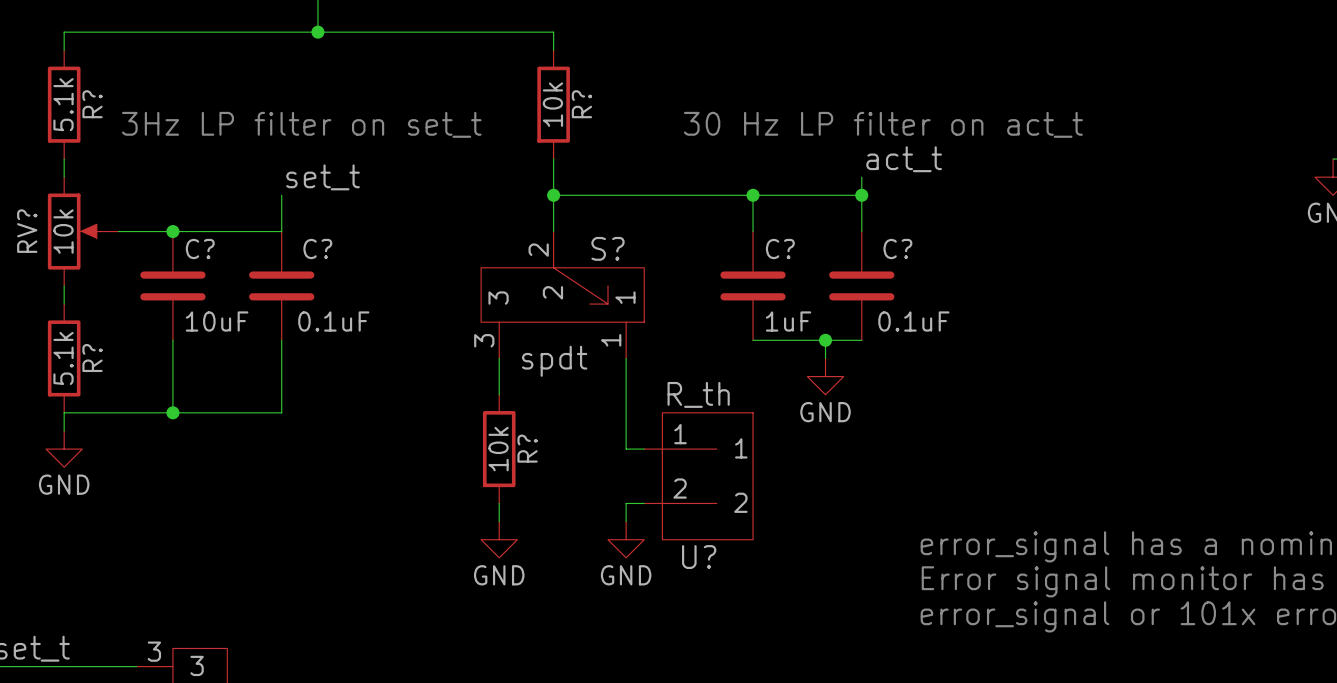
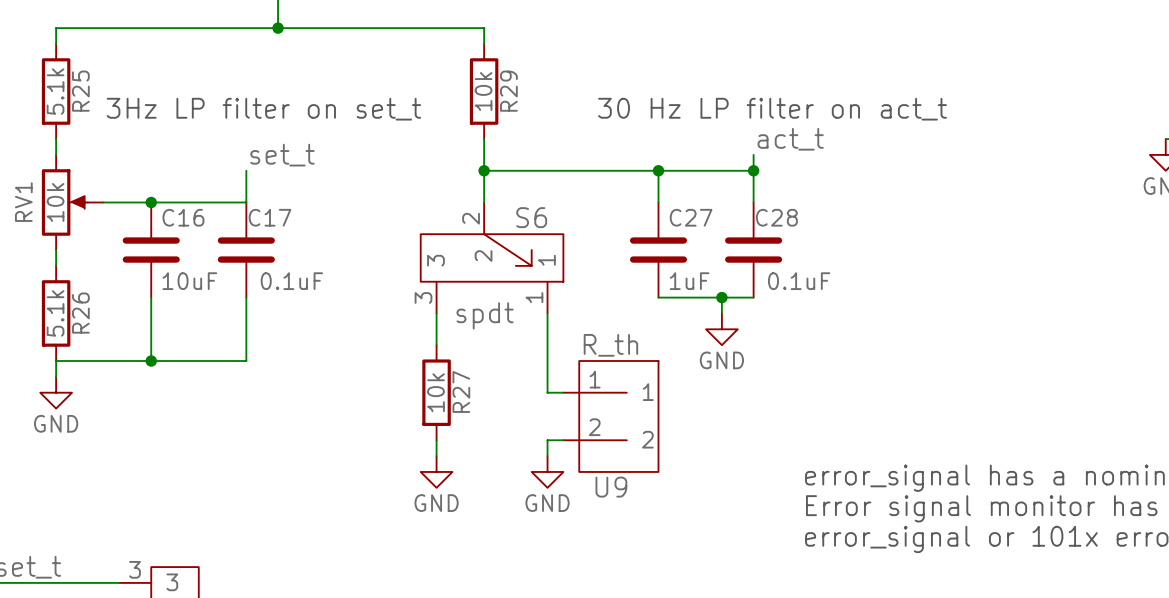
R? name: R? (92, 104) -> R25 (80, 91)
R? name: R? (581, 104) -> R29 (508, 91)
RV? name: RV? (27, 231) -> RV1 (23, 202)
S? name: S? (608, 248) -> S6 (531, 217)
C? name: C? (200, 249) -> C16 (183, 217)
C? name: C? (317, 249) -> C17 (270, 217)
C? name: C? (780, 249) -> C27 (691, 217)
C? name: C? (897, 249) -> C28 (776, 217)
R? name: R? (92, 358) -> R26 (80, 313)
R? name: R? (527, 448) -> R27 (461, 391)
U? name: U? (699, 557) -> U9 (611, 487)

